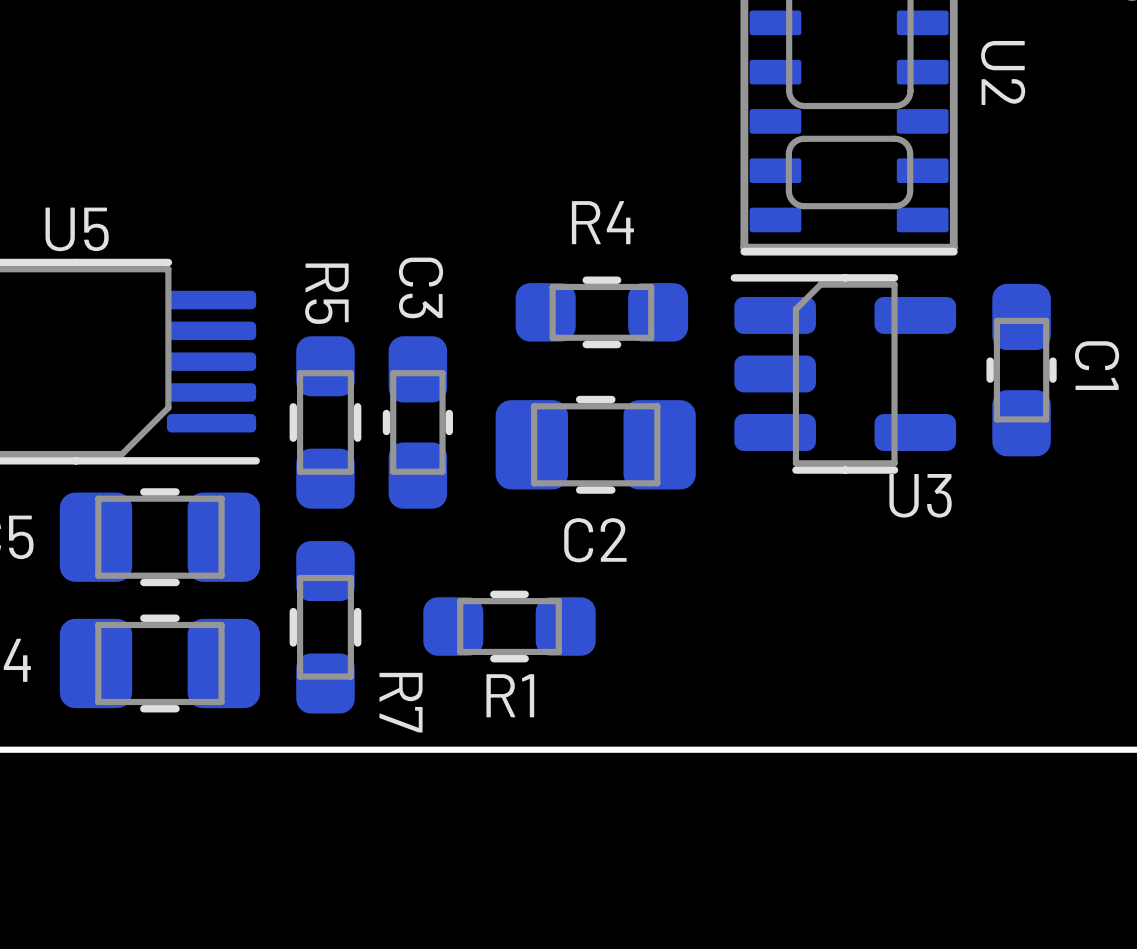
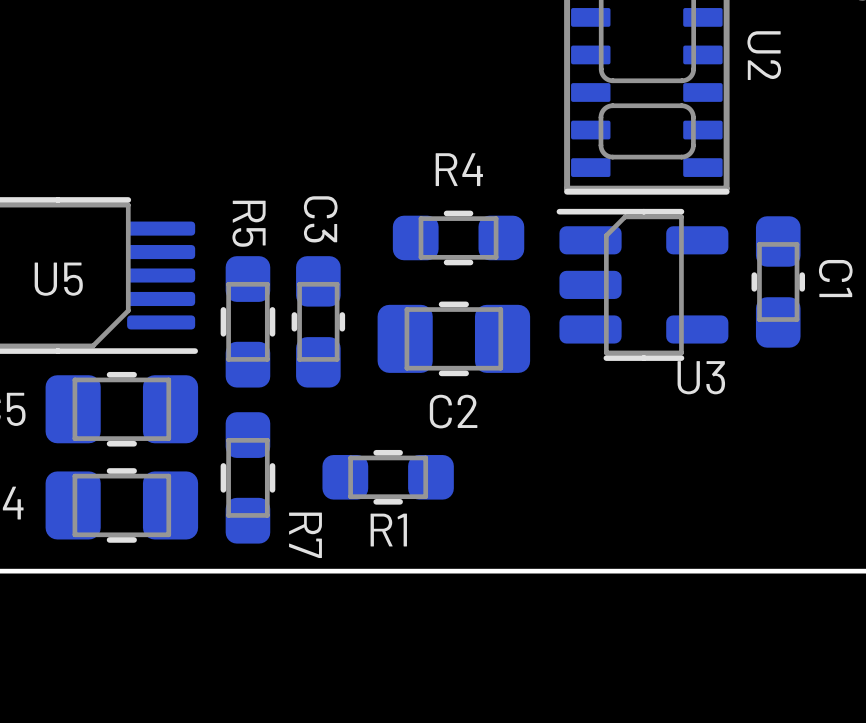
U5 name position: U5 (77, 229) -> U5 (58, 279)

